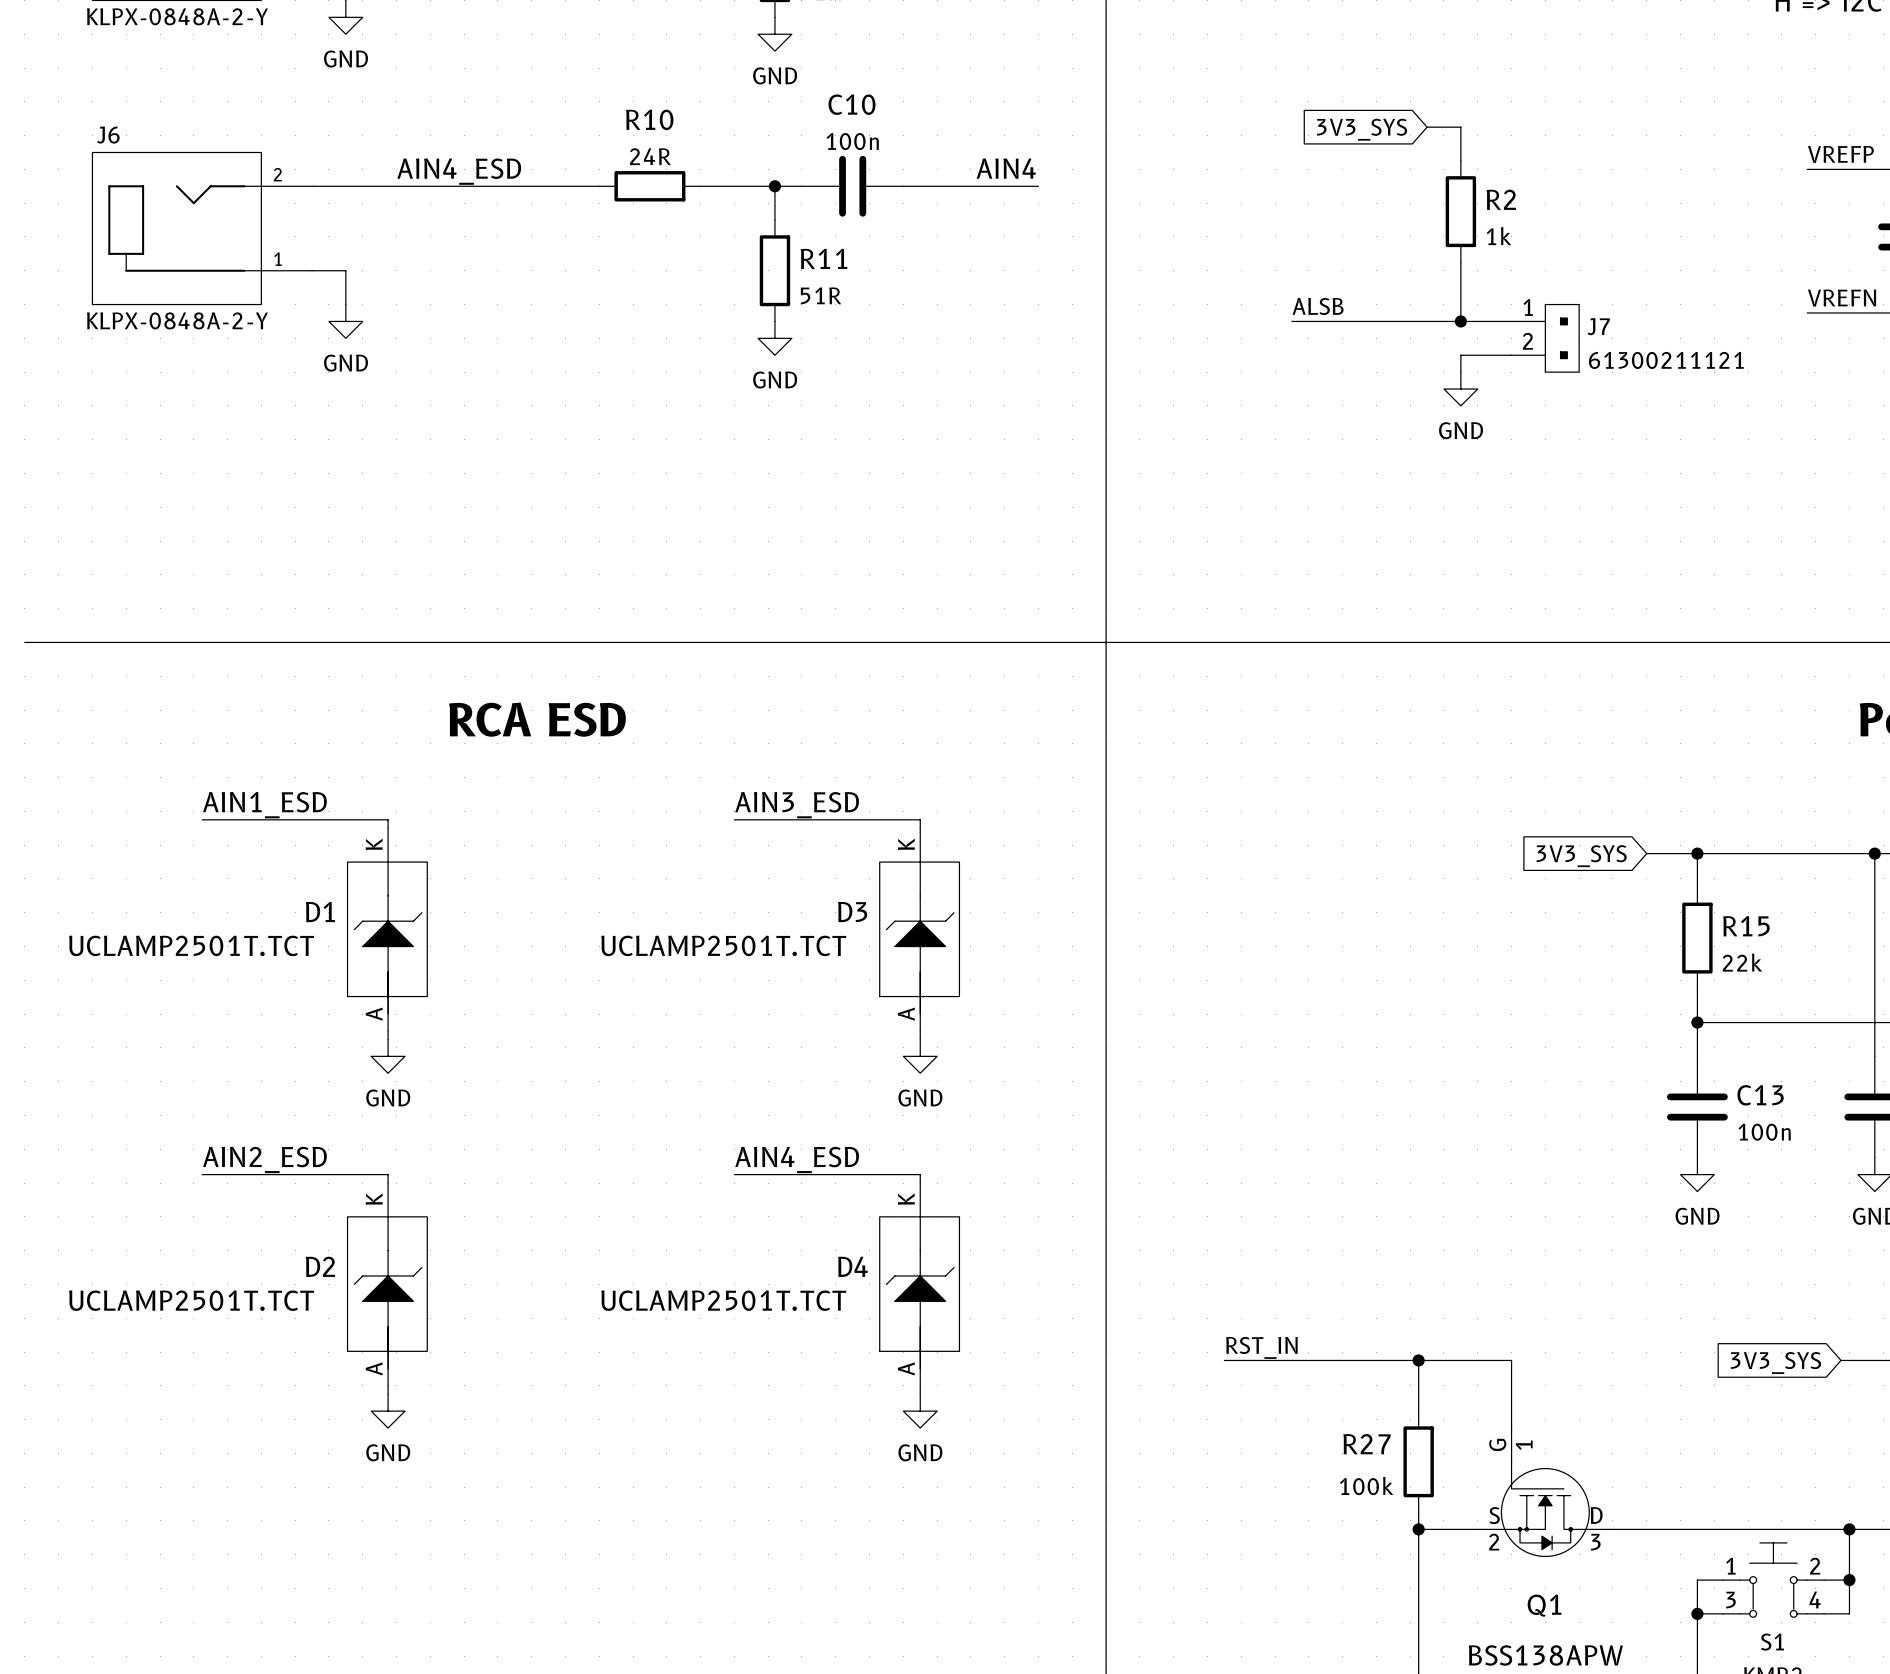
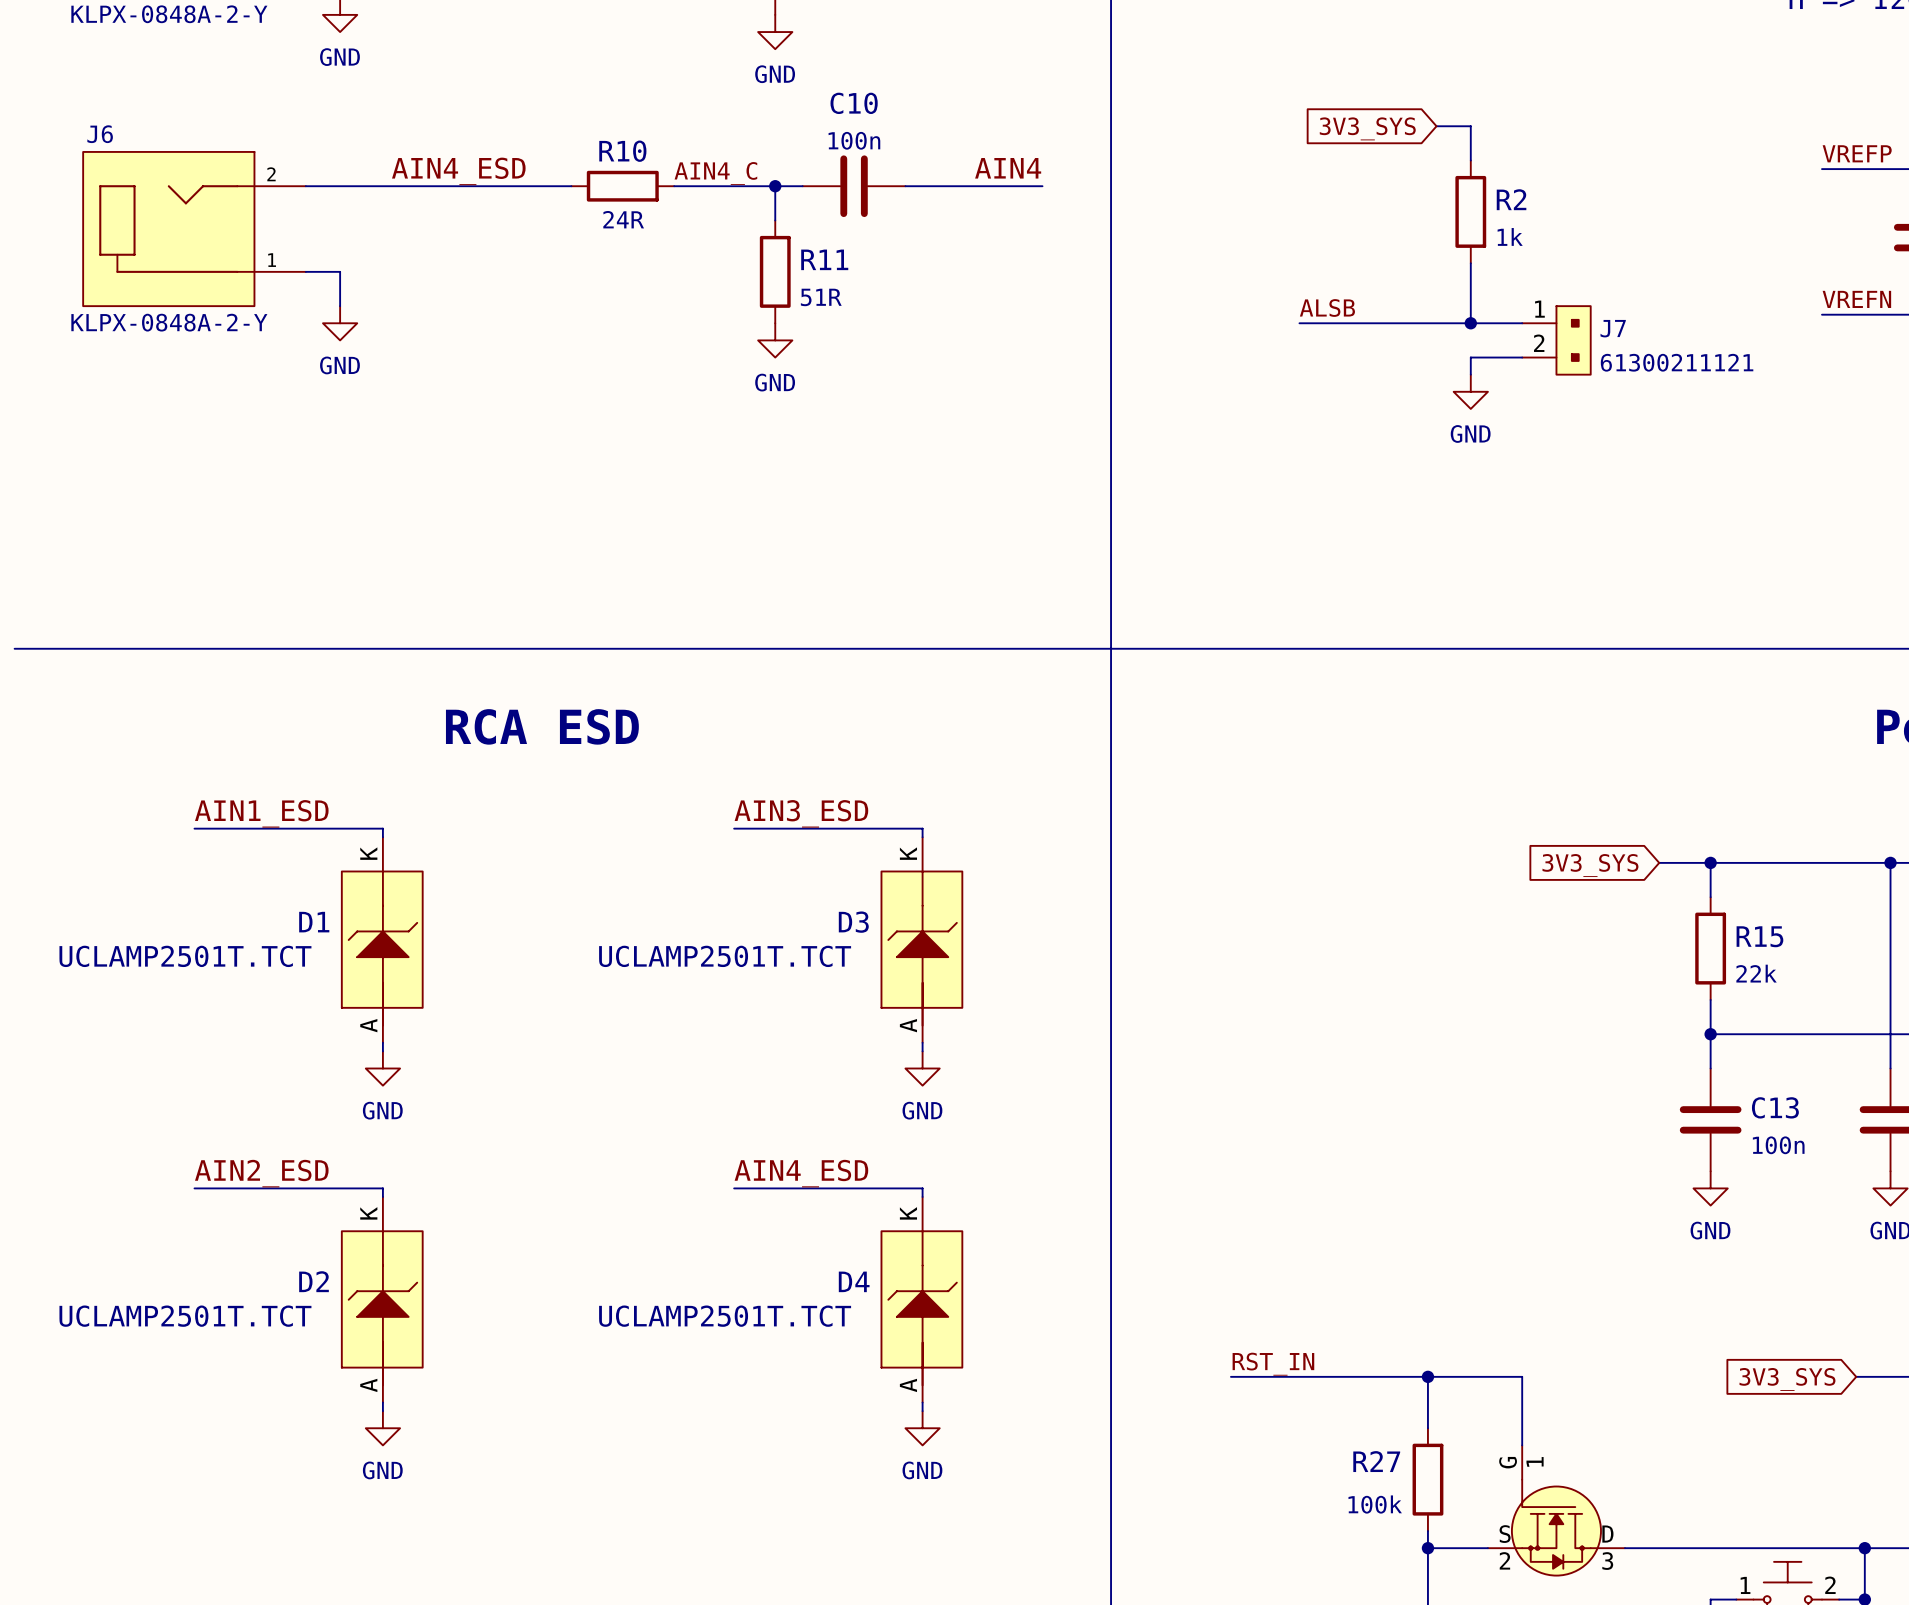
R10 name position: R10 (649, 119) -> R10 (622, 151)
R10 text position: 24R (650, 156) -> 24R (623, 219)
label: none -> AIN4_C (715, 173)
R10 position: (649, 186) -> (622, 186)

